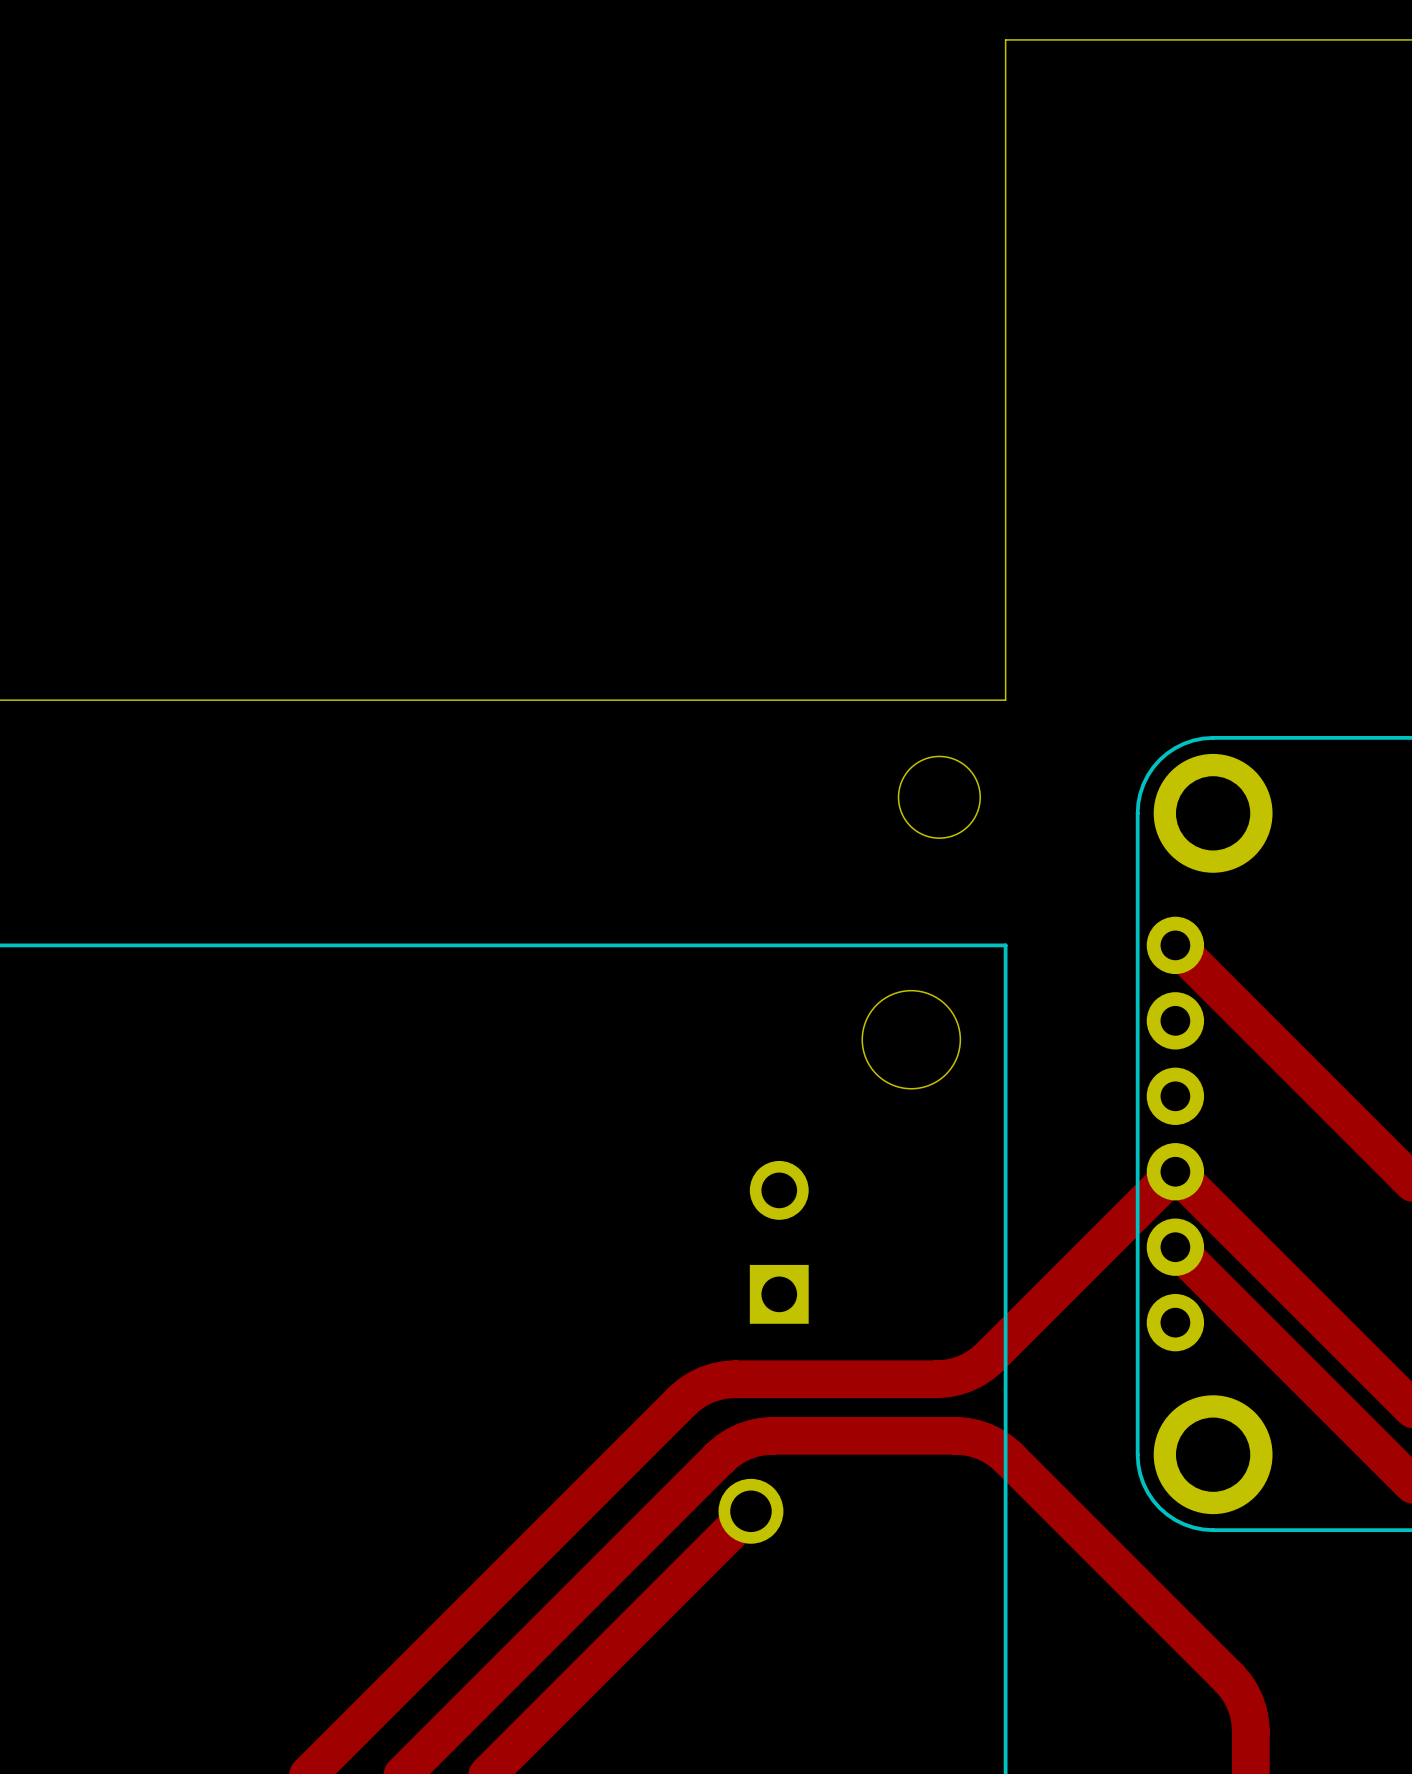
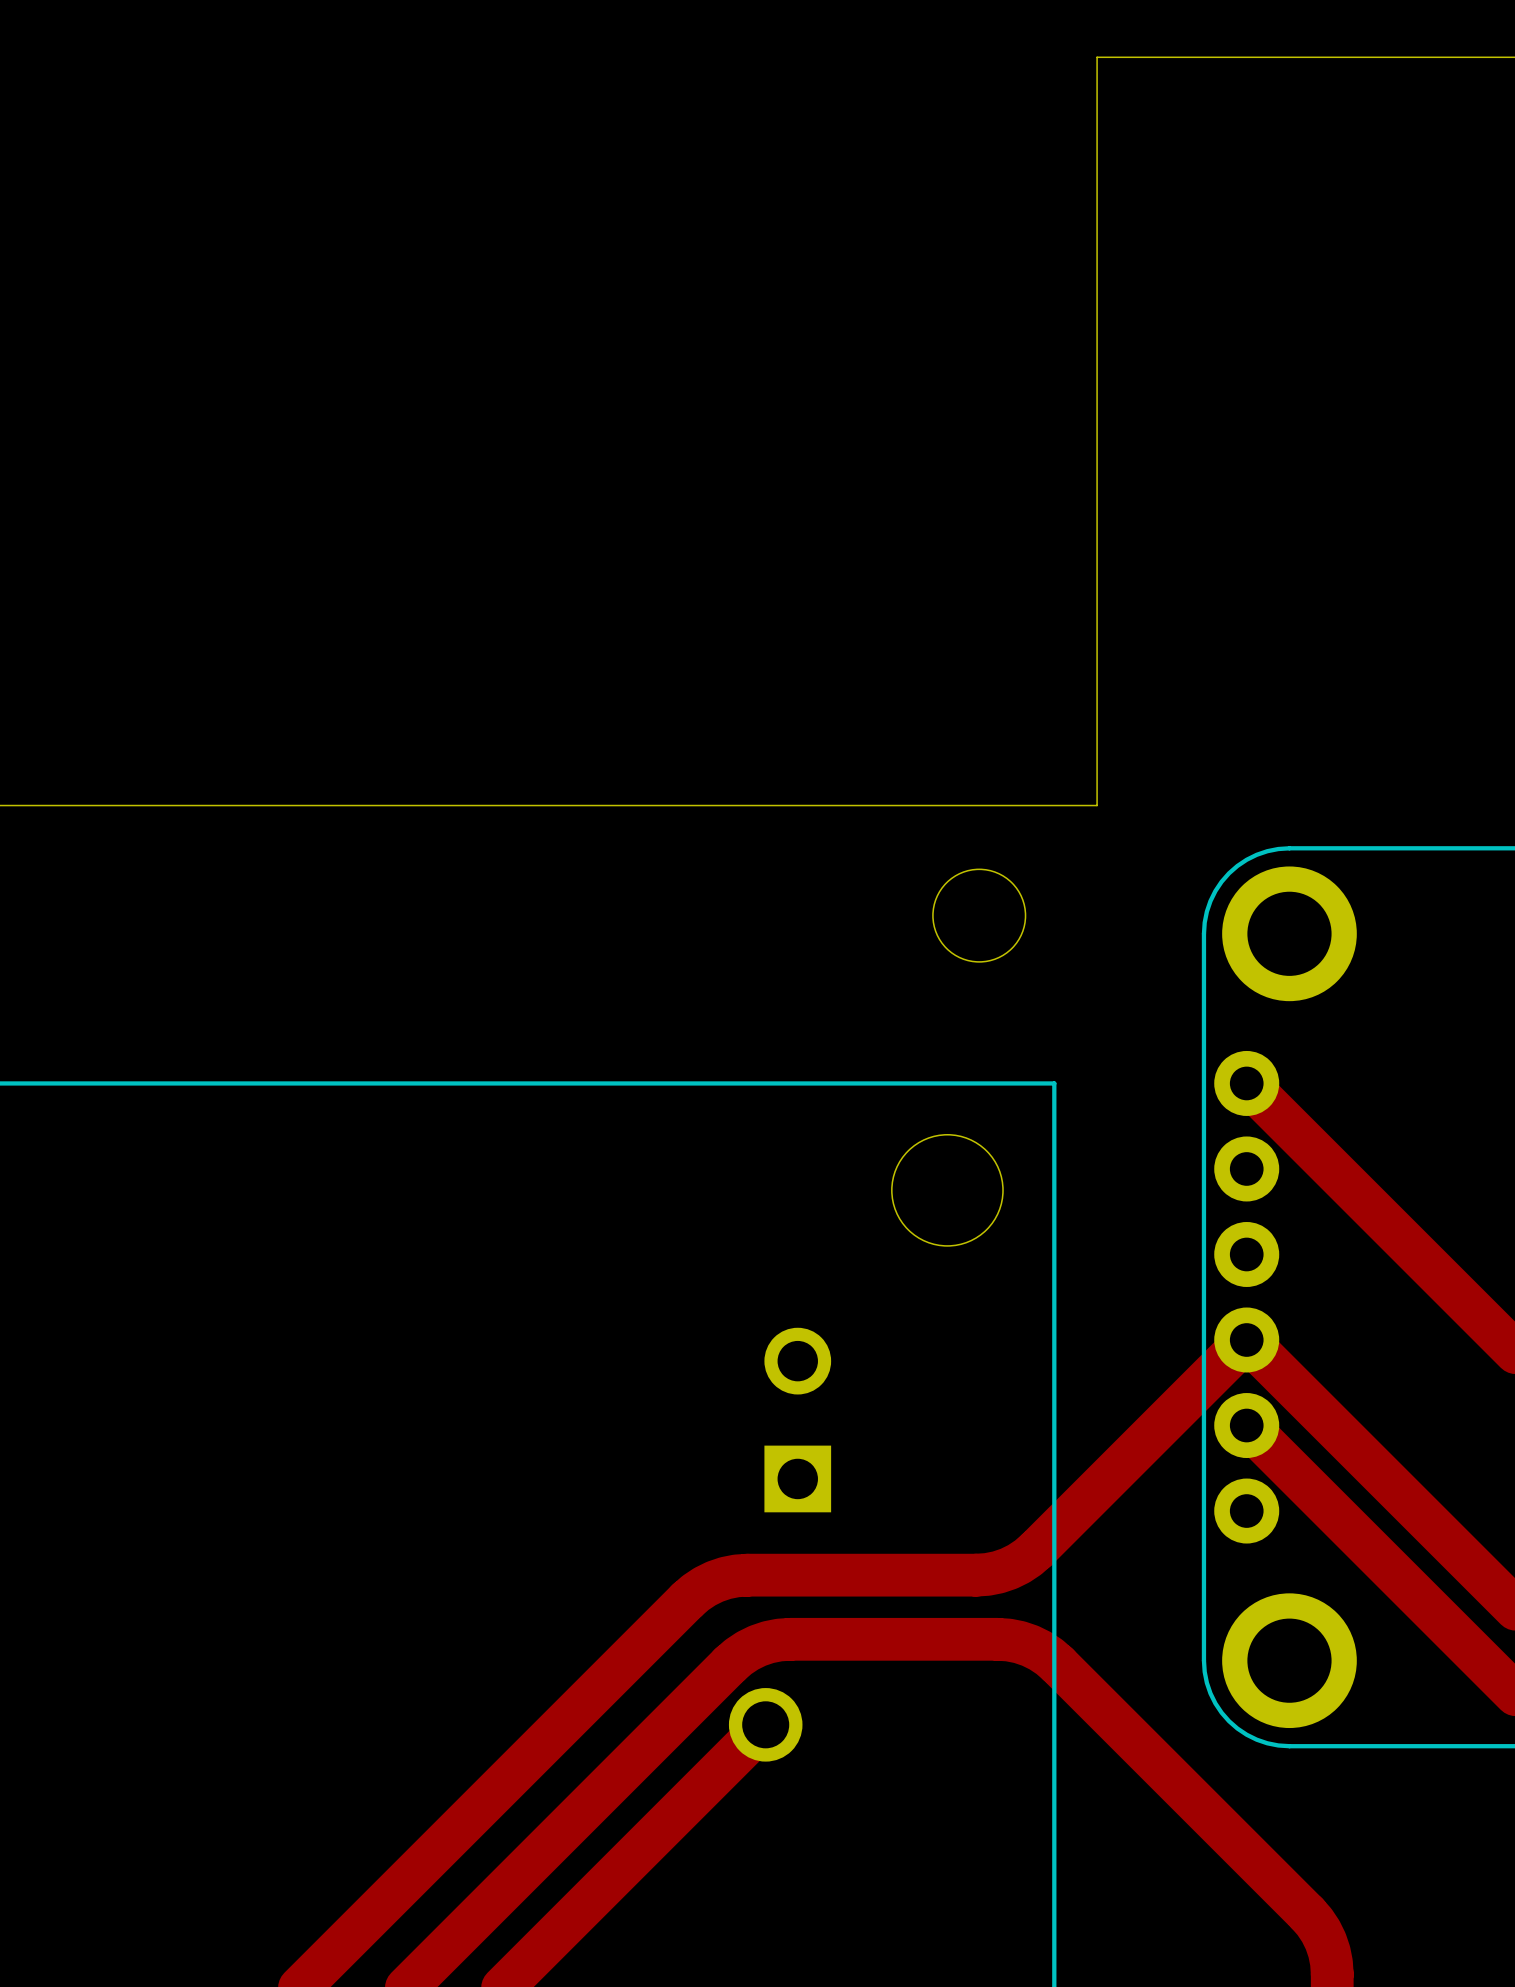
board edge: (1043, 39) (1005, 39) (1005, 700) -> (1097, 57) (1097, 805) (1054, 805)

